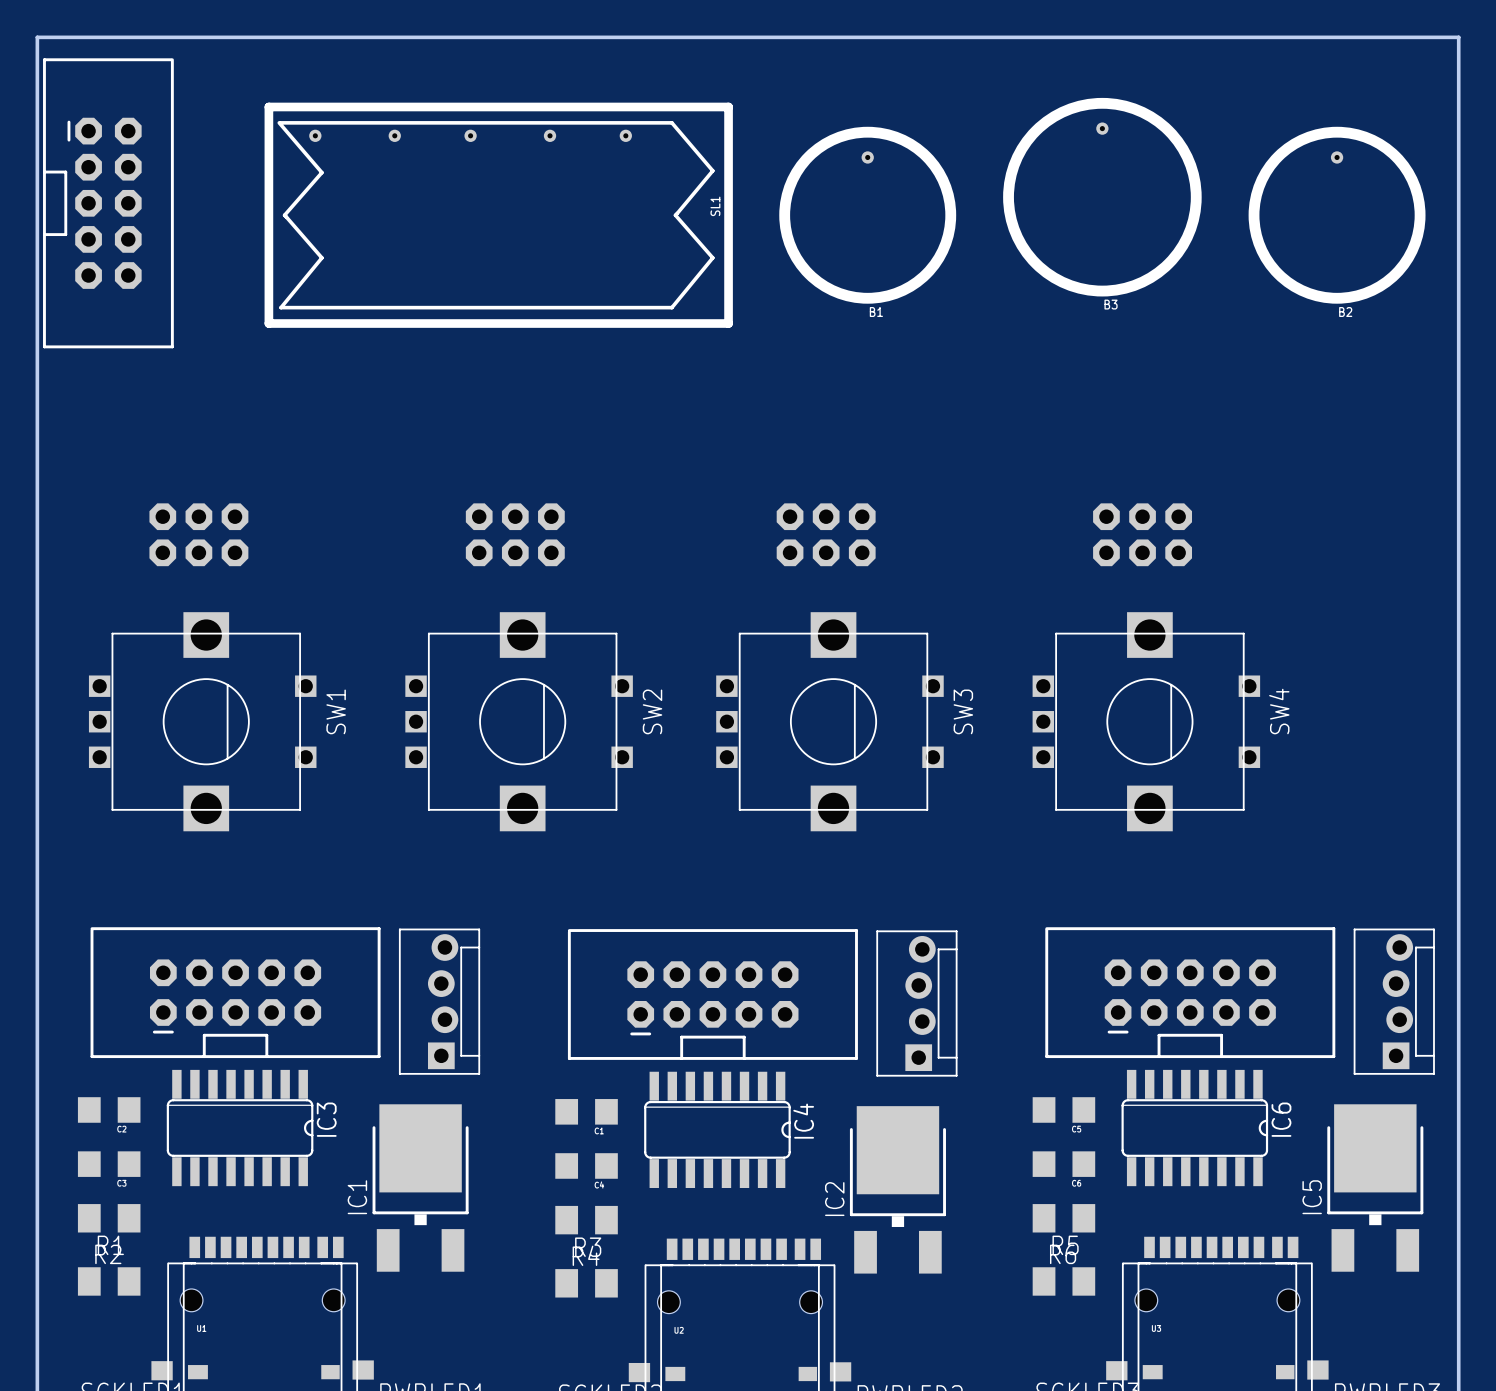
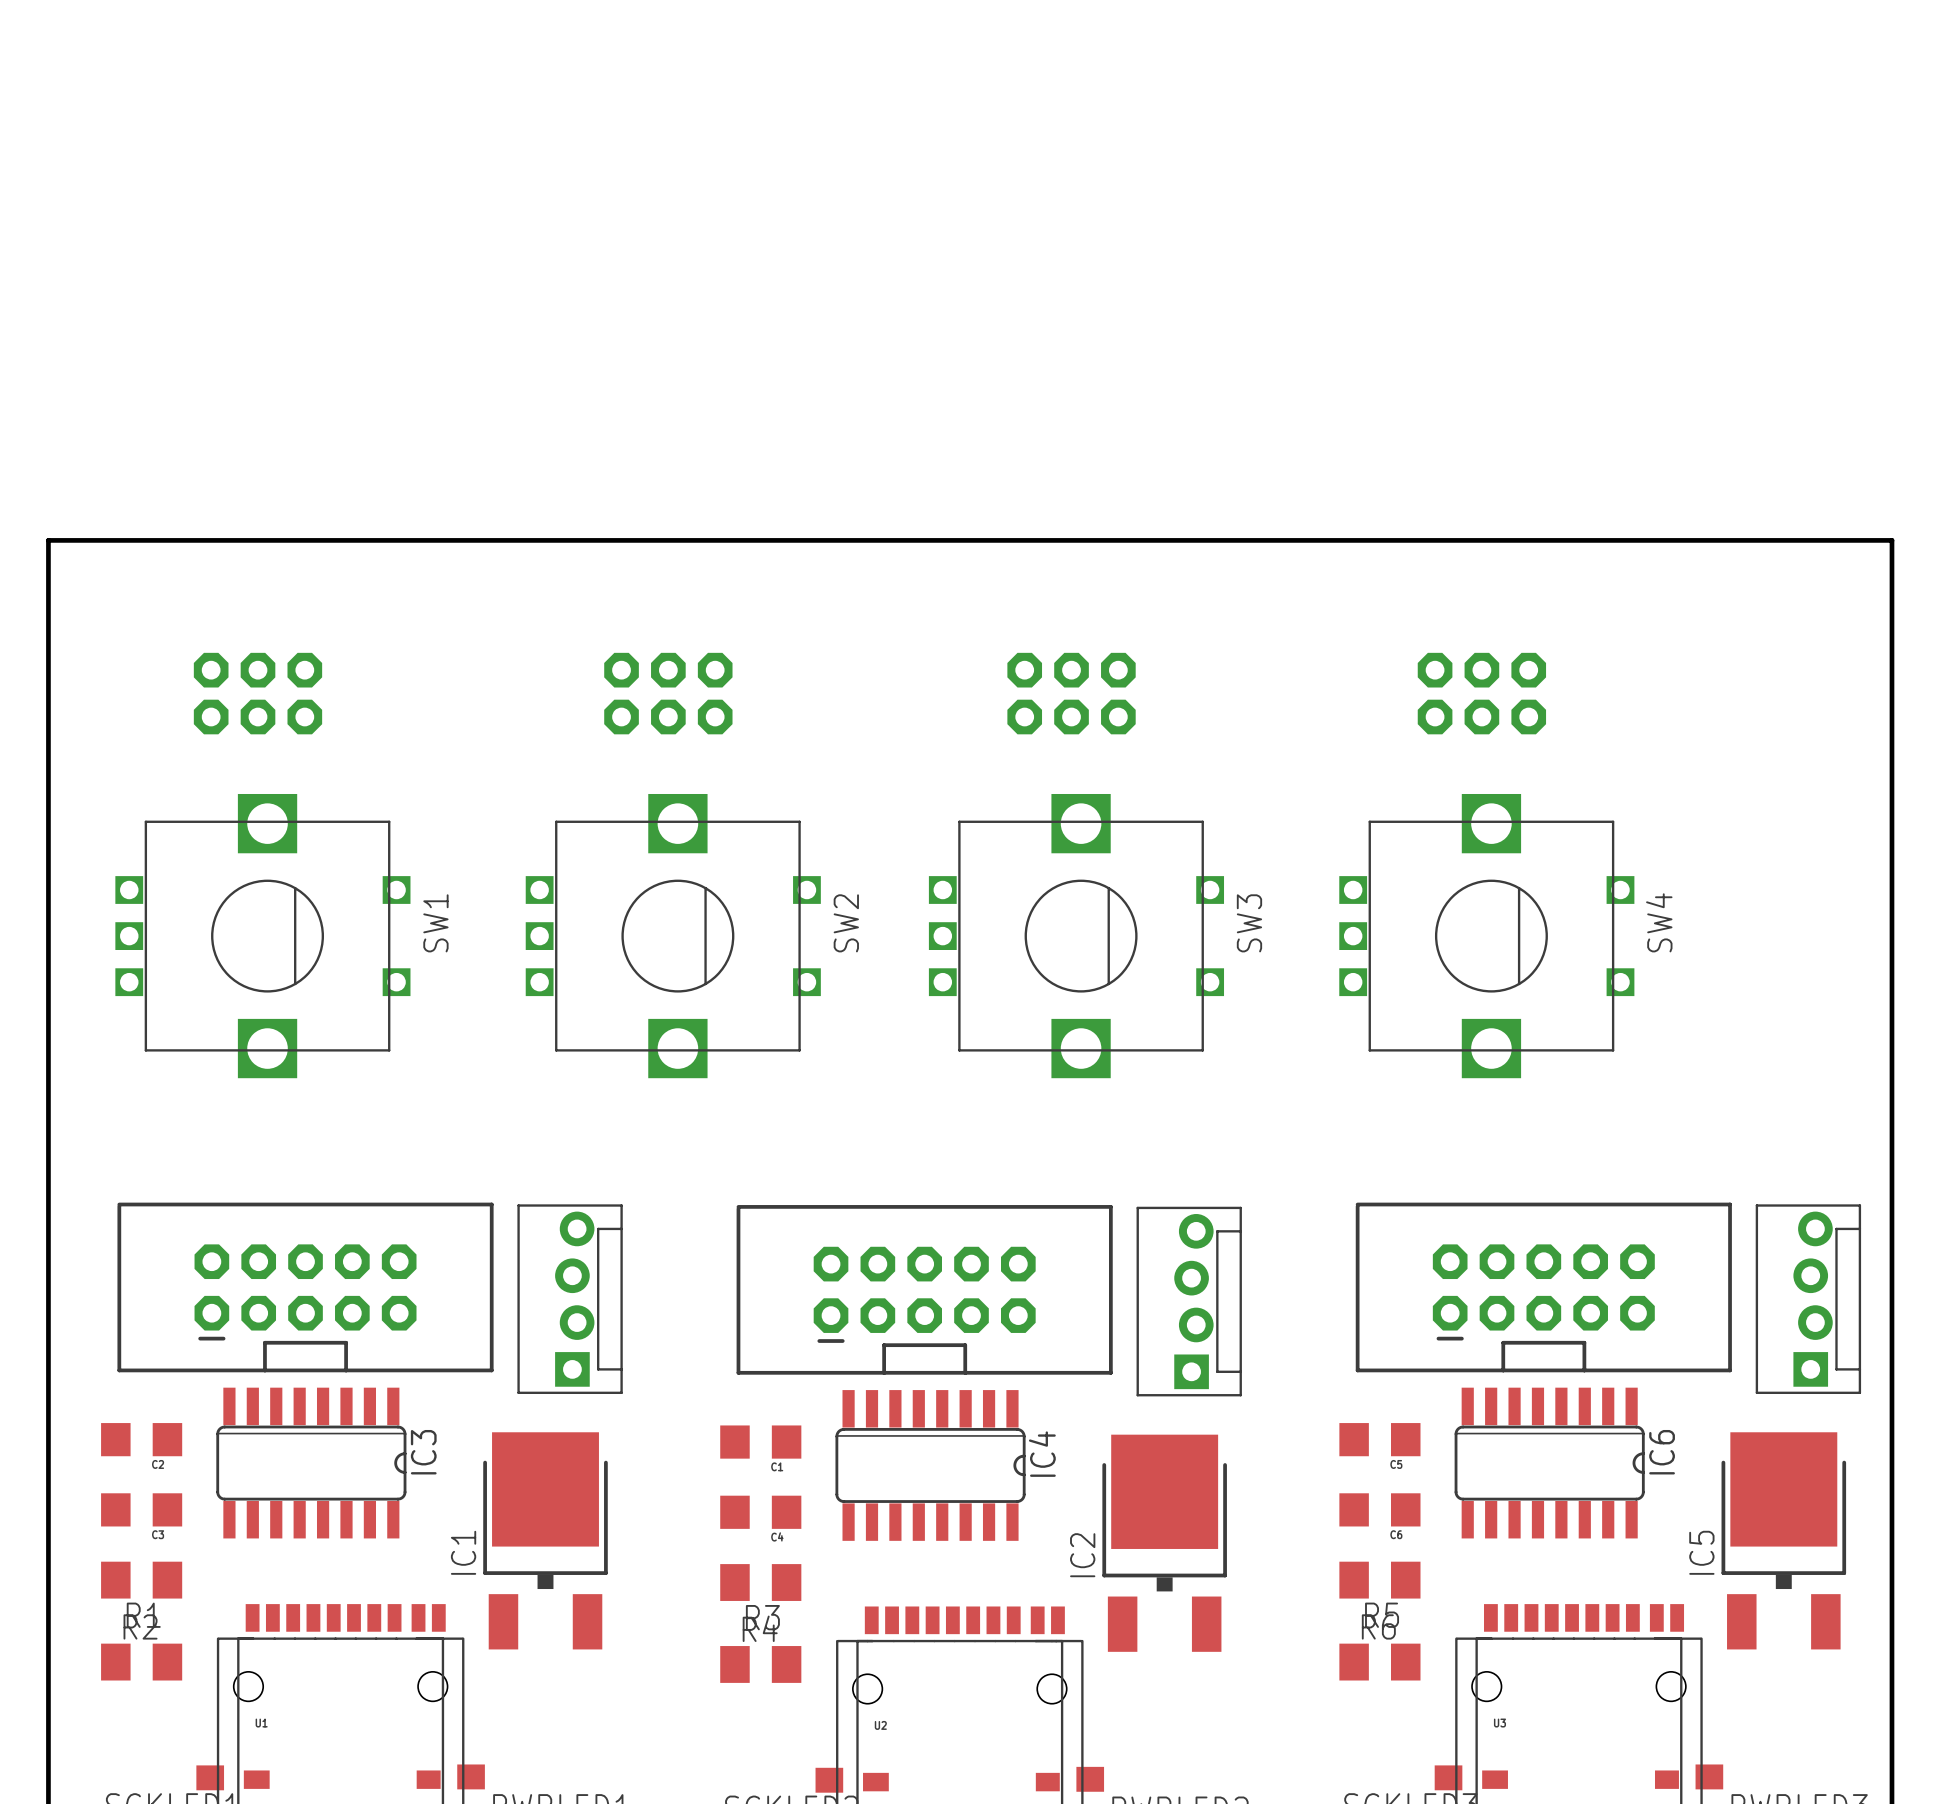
B3: (1102, 197) -> none
part: (108, 203) -> none
SL1: (498, 215) -> none
B1: (867, 215) -> none
B2: (1337, 215) -> none
board edge: (37, 416) (37, 37) (1458, 37) (1458, 416) -> (48, 540) (1891, 540)

